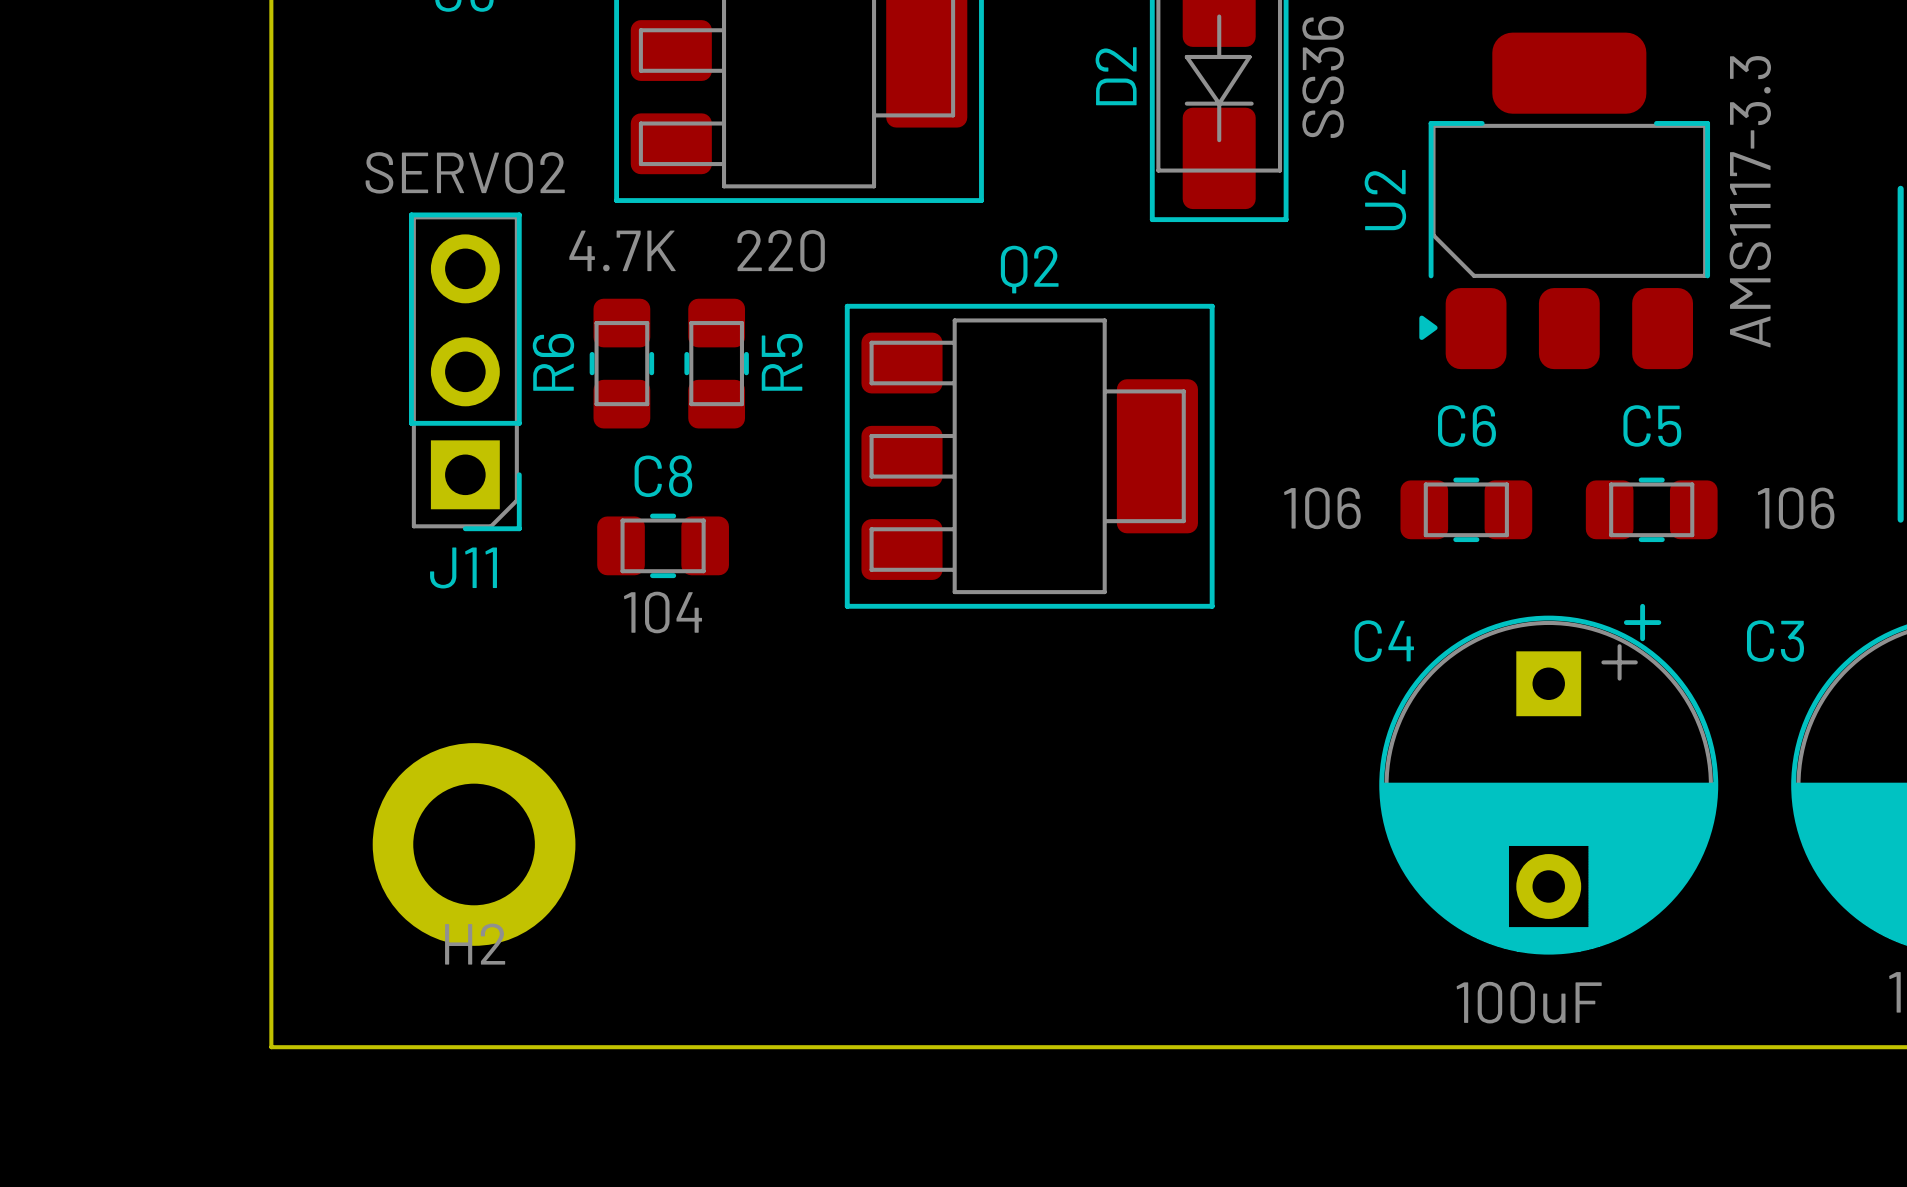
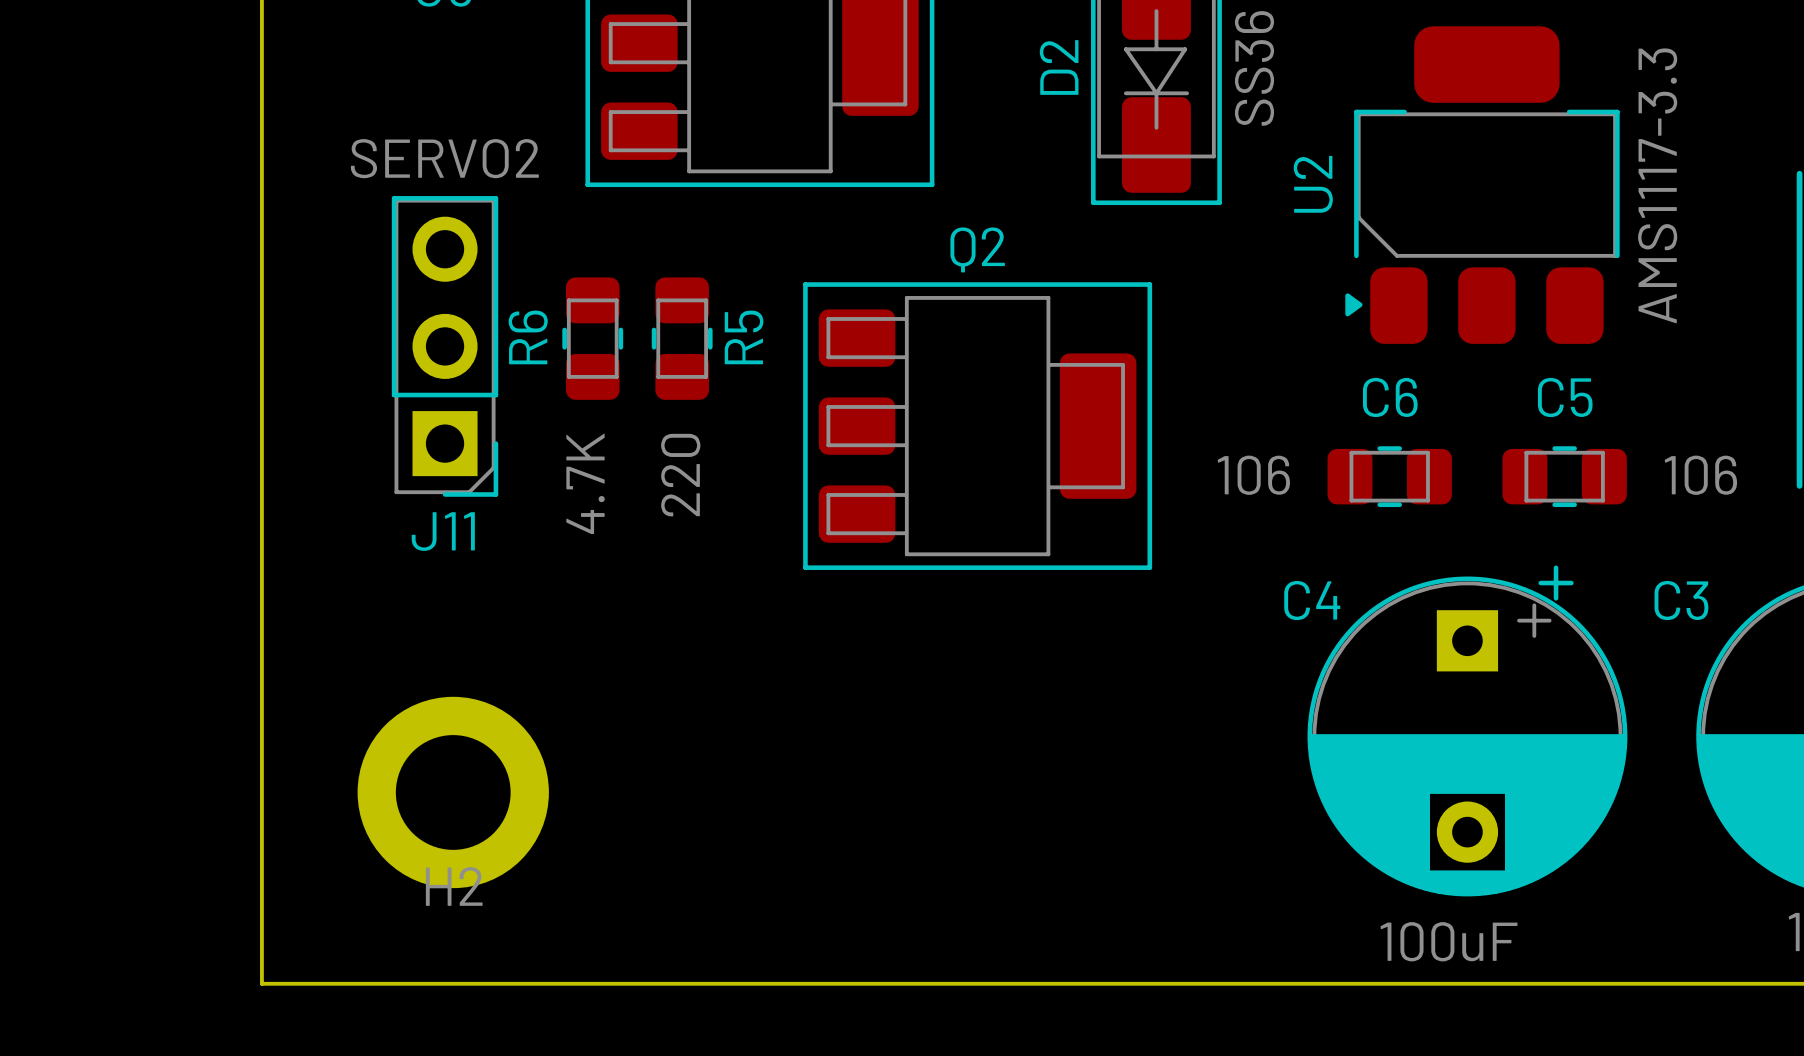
R6 value rotation: 0° (622, 250) -> 90° counterclockwise (585, 483)
R6 value position: 4.7K (622, 250) -> 4.7K (585, 483)
R5 value rotation: 0° (781, 250) -> 90° counterclockwise (680, 475)
R5 value position: 220 (781, 250) -> 220 (680, 475)
C8: 104 (663, 545) -> none

